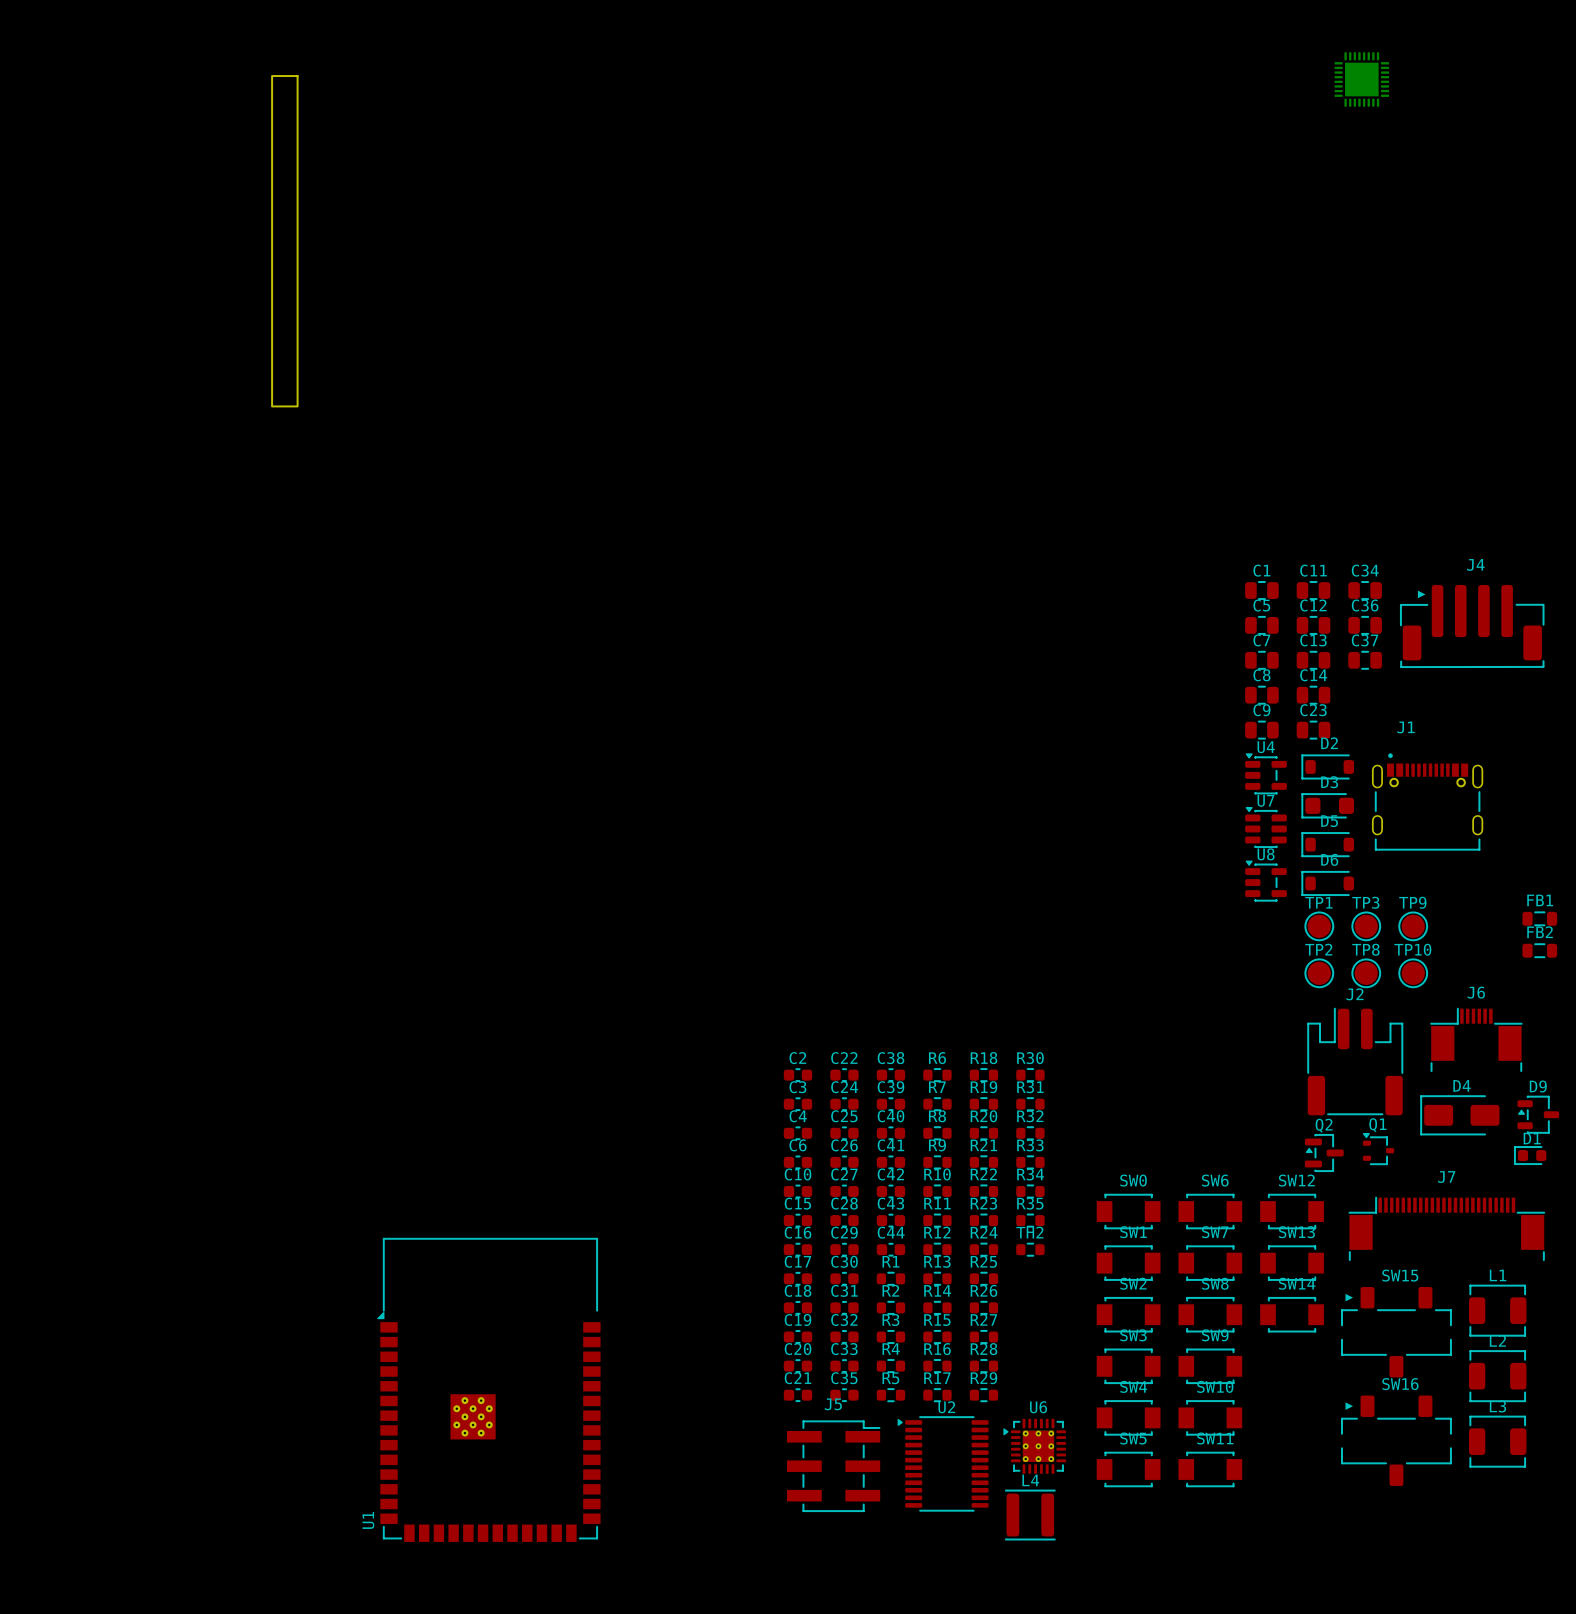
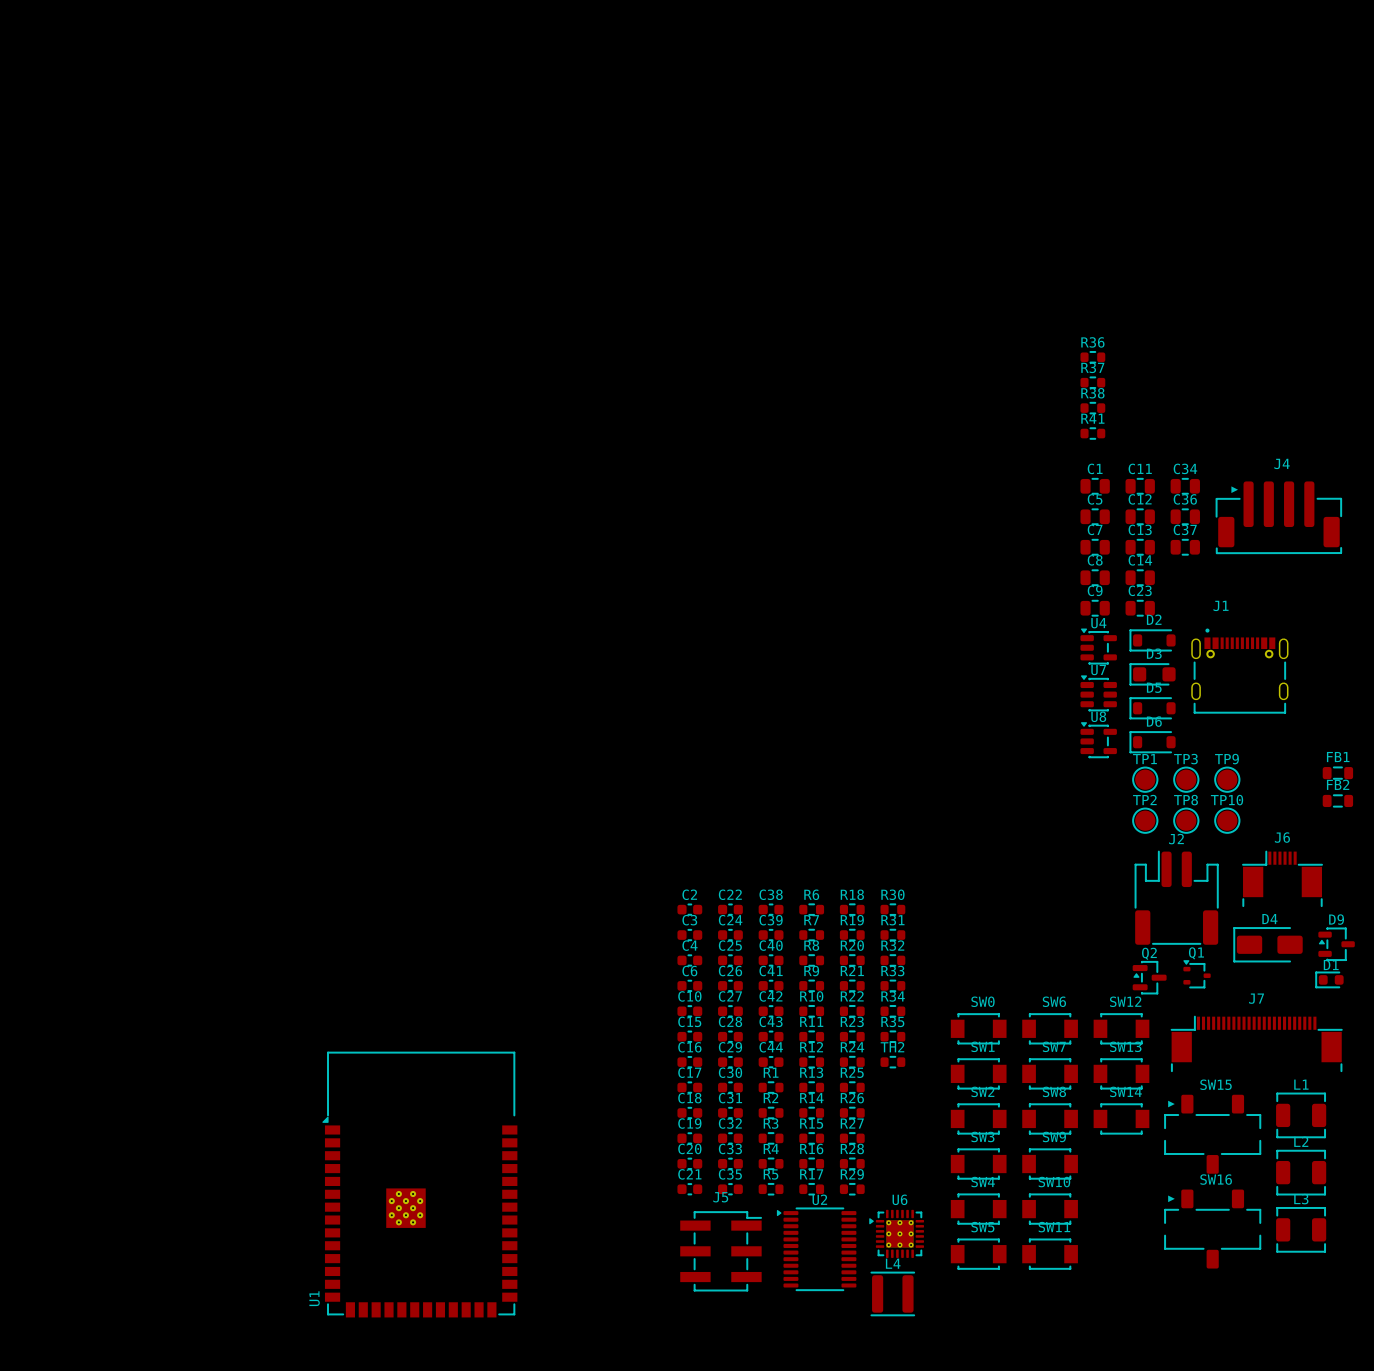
drawing: [271, 75, 298, 407] -> none
part: (1361, 79) -> none
R36: none -> (1092, 357)
R37: none -> (1092, 382)
R38: none -> (1092, 408)
R41: none -> (1092, 433)

